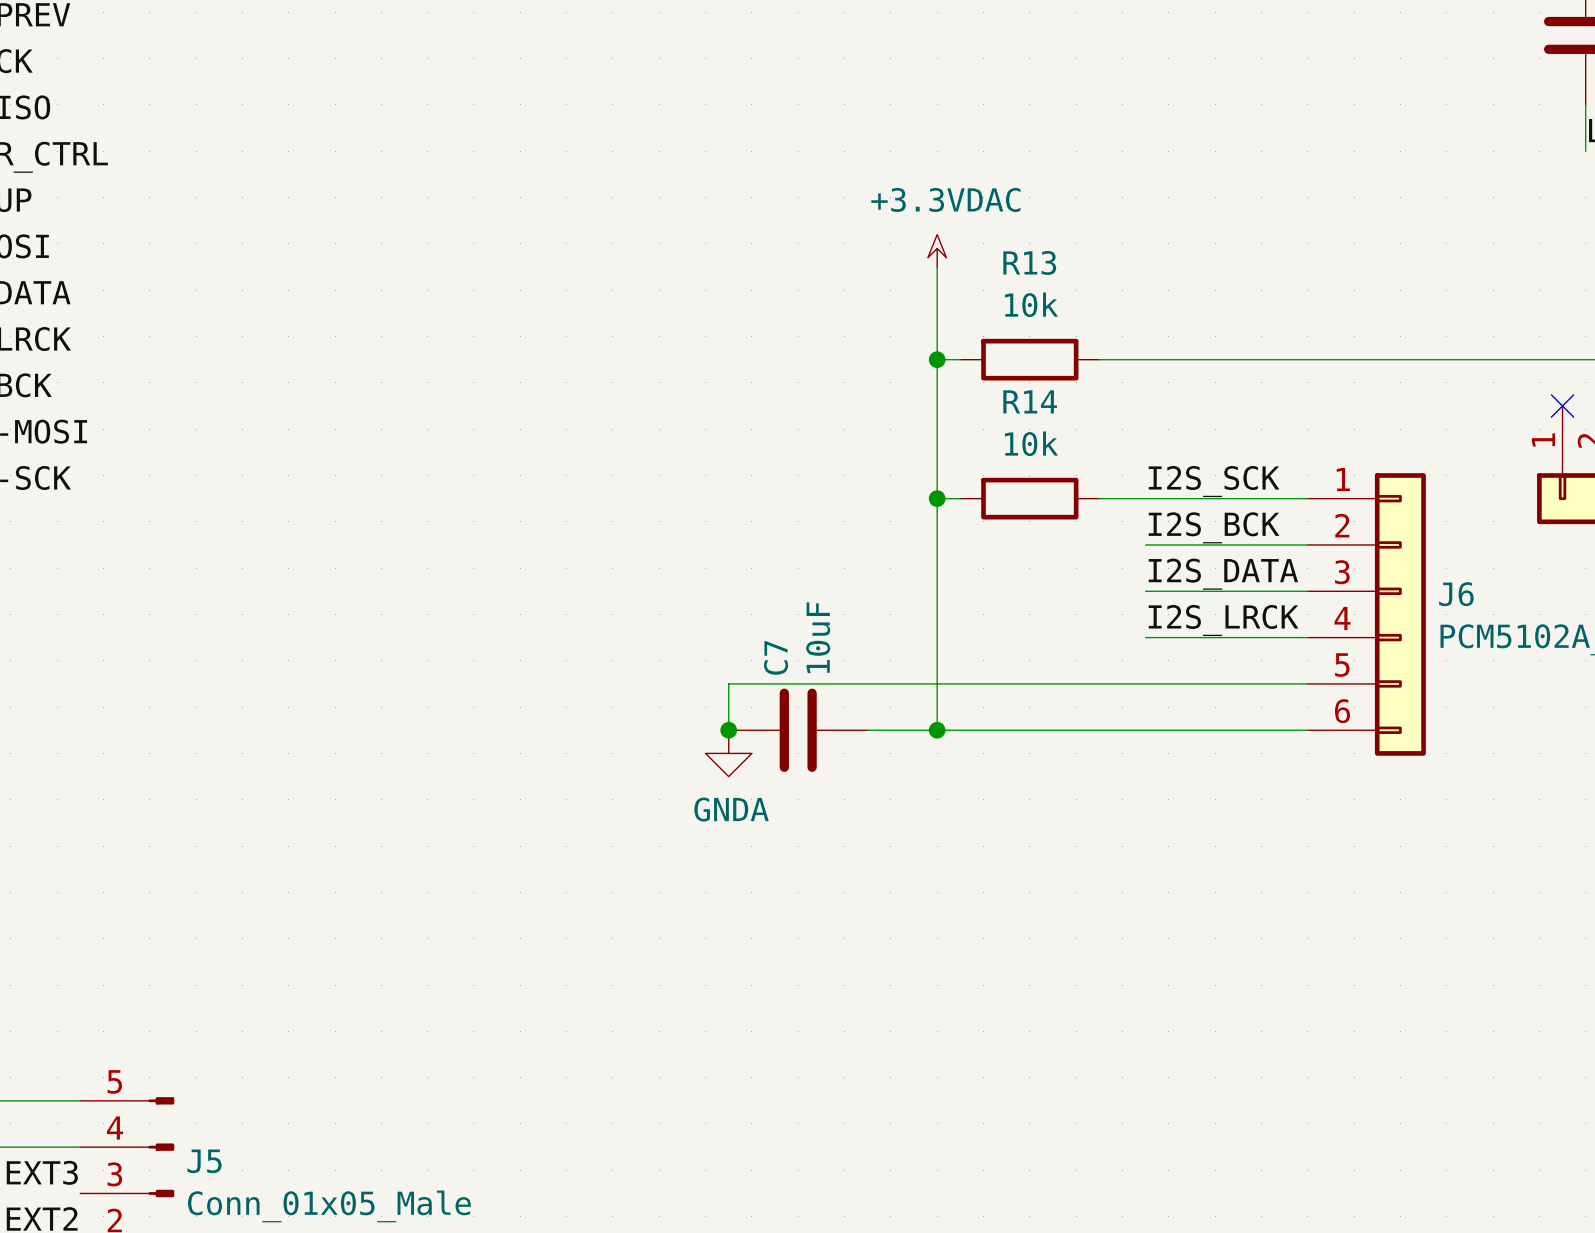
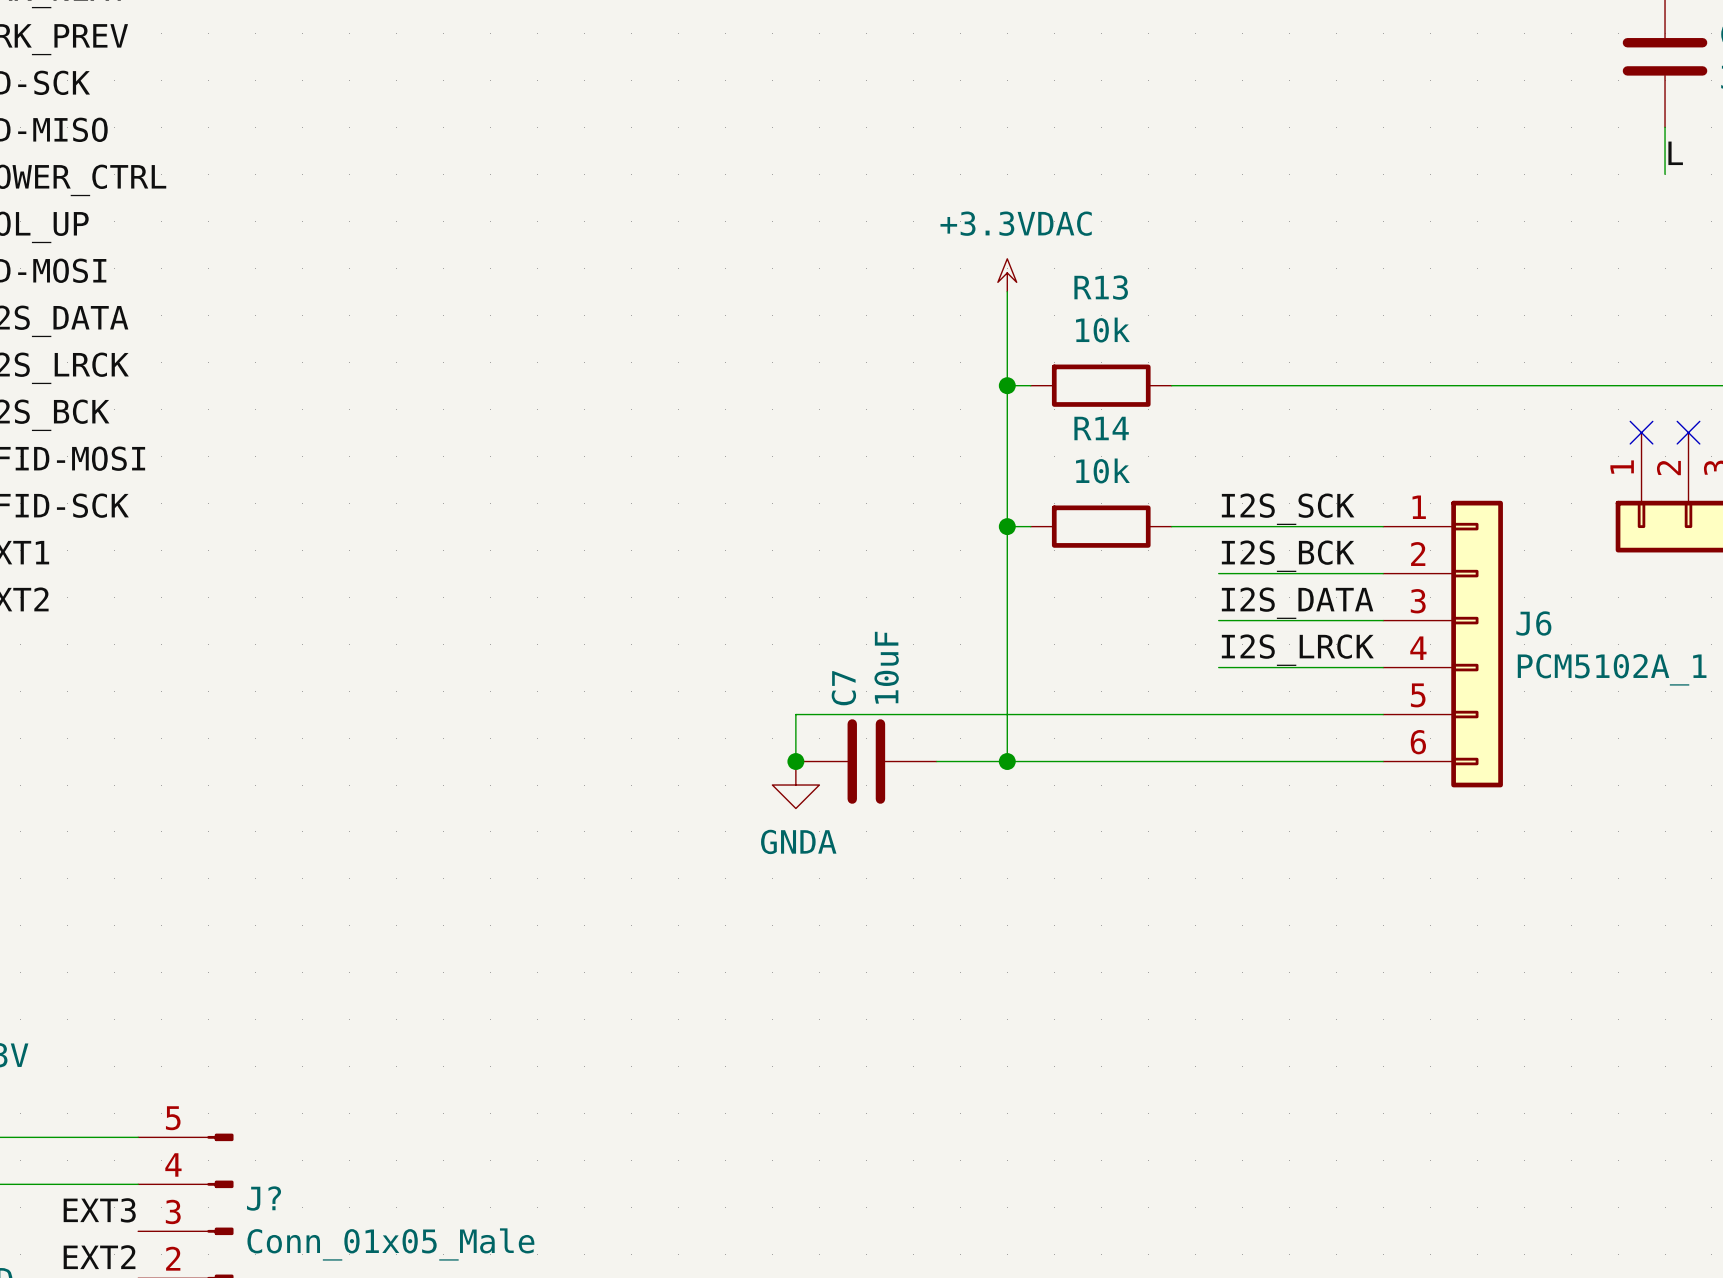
J5 name: J5 (204, 1161) -> J? (264, 1198)

